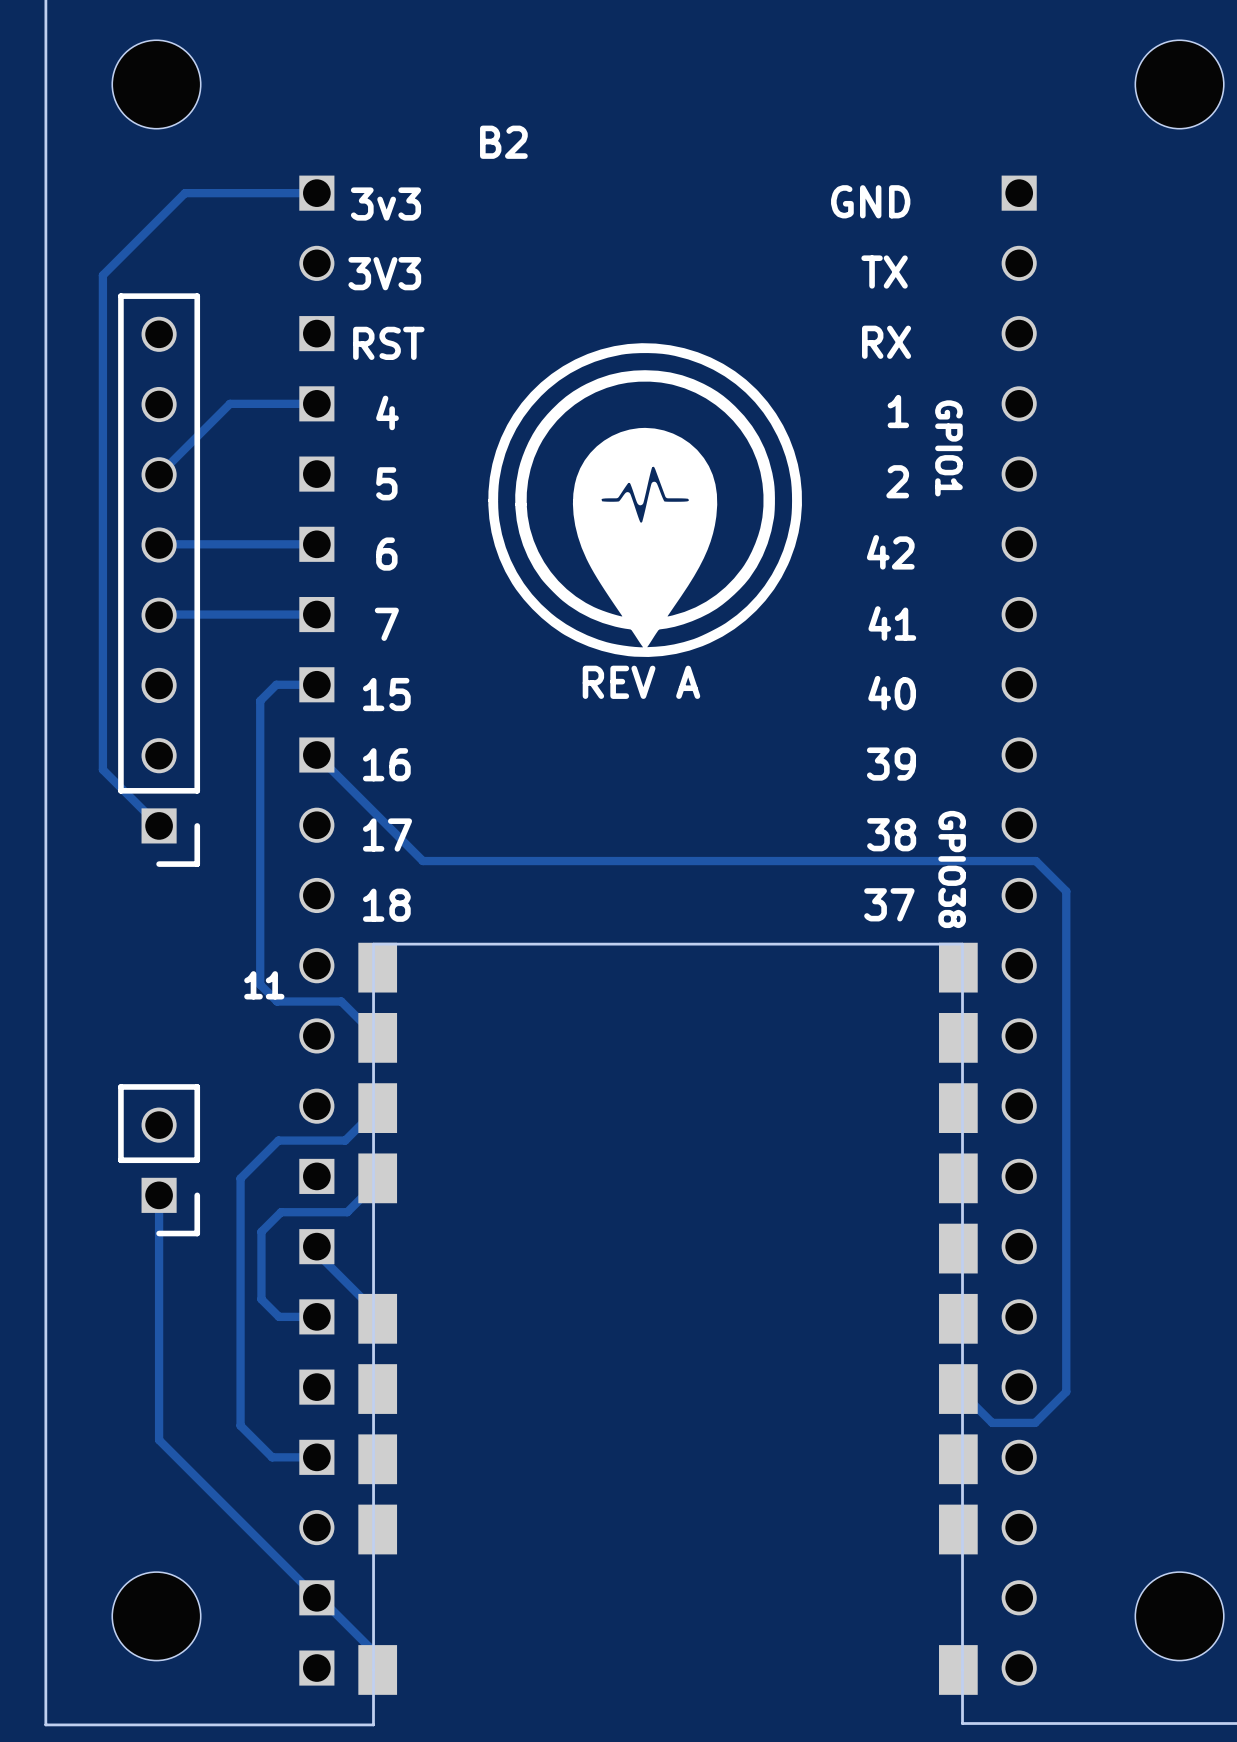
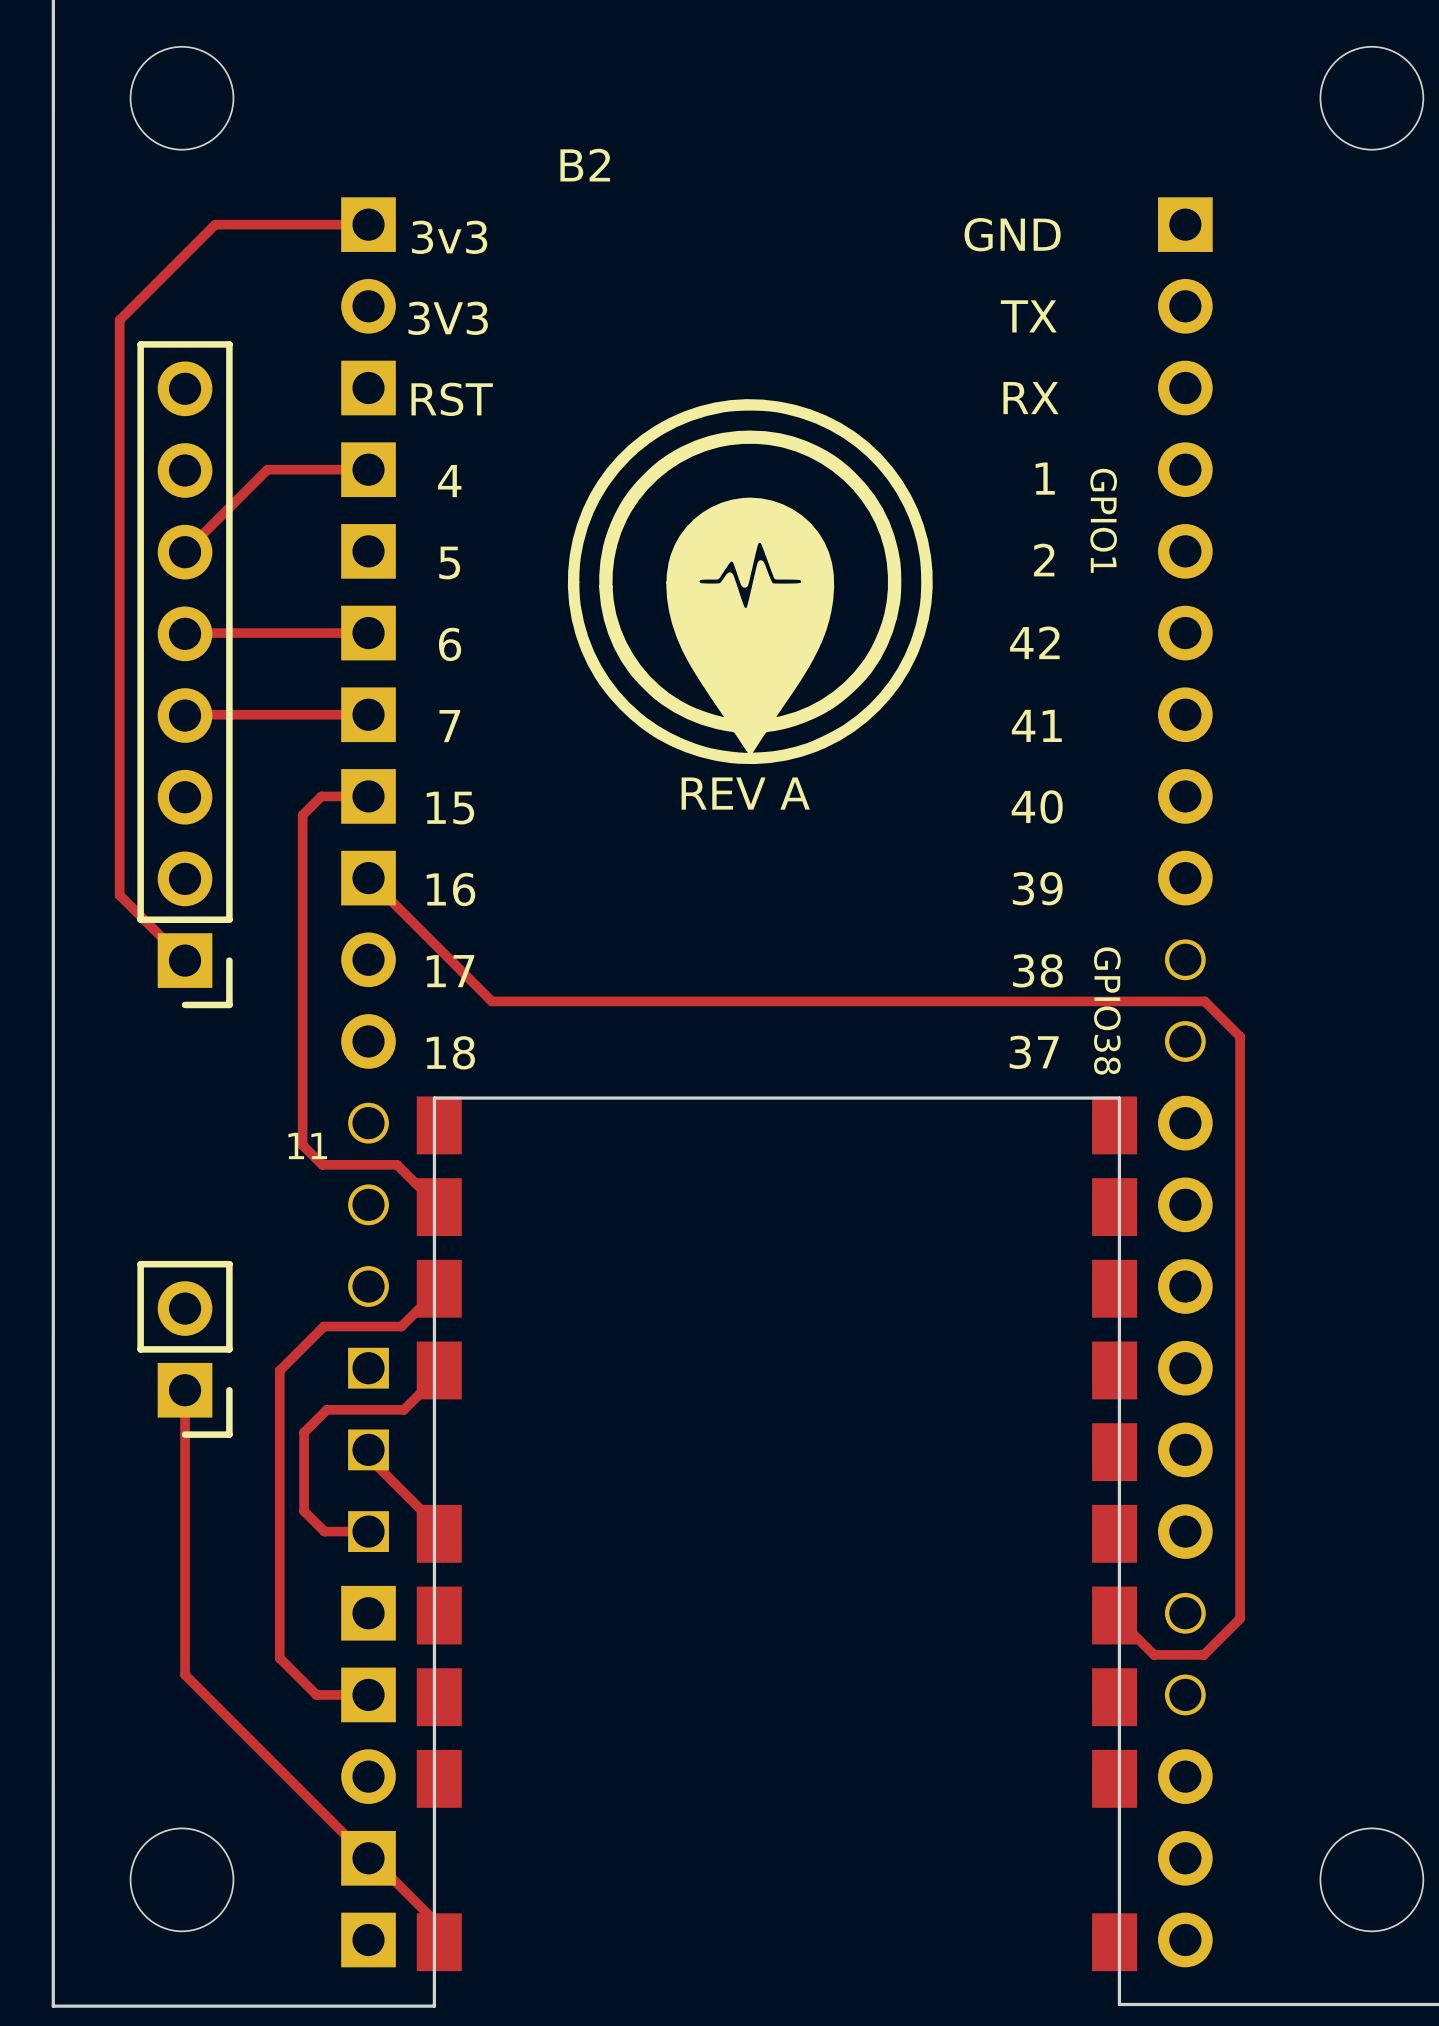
B2 footprint: [299, 175, 1037, 1686] -> [341, 197, 1213, 1968]
part footprint: [118, 293, 201, 867] -> [137, 341, 233, 1009]
part footprint: [118, 1084, 201, 1237] -> [137, 1260, 233, 1438]

